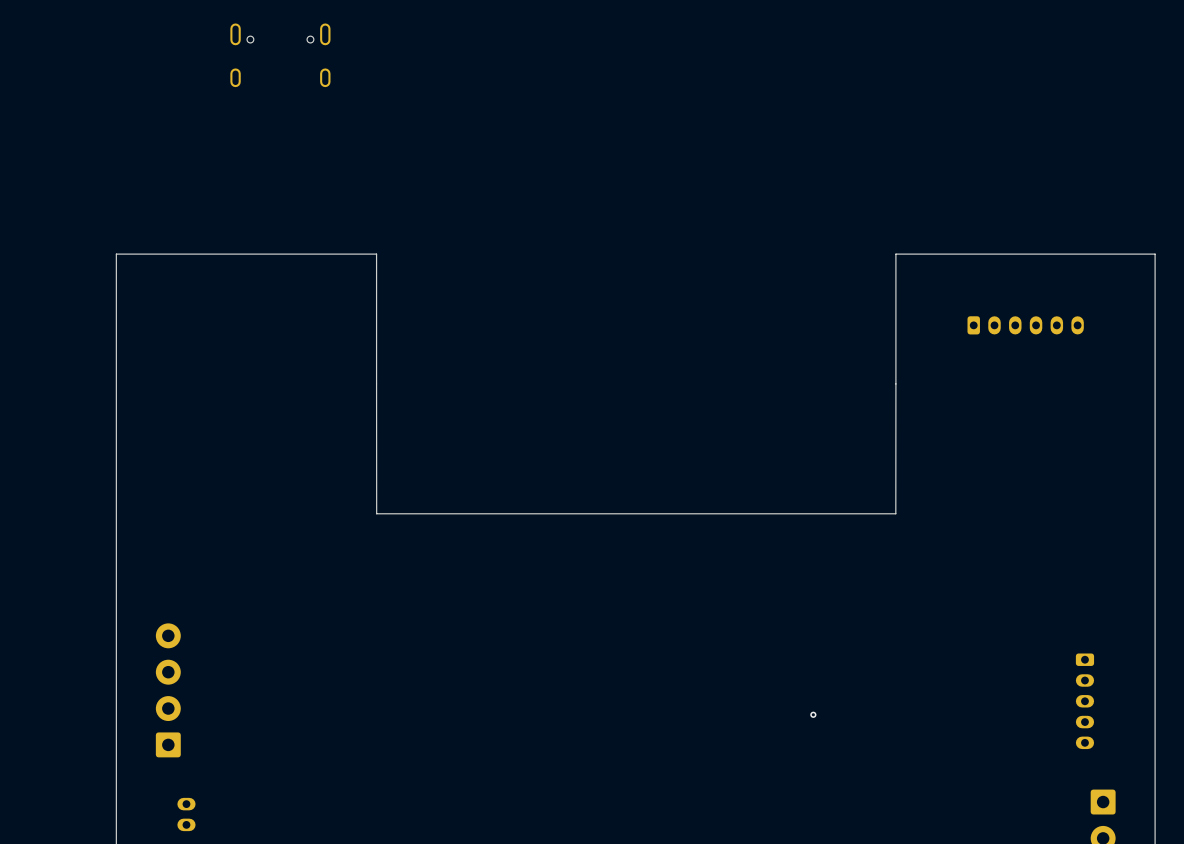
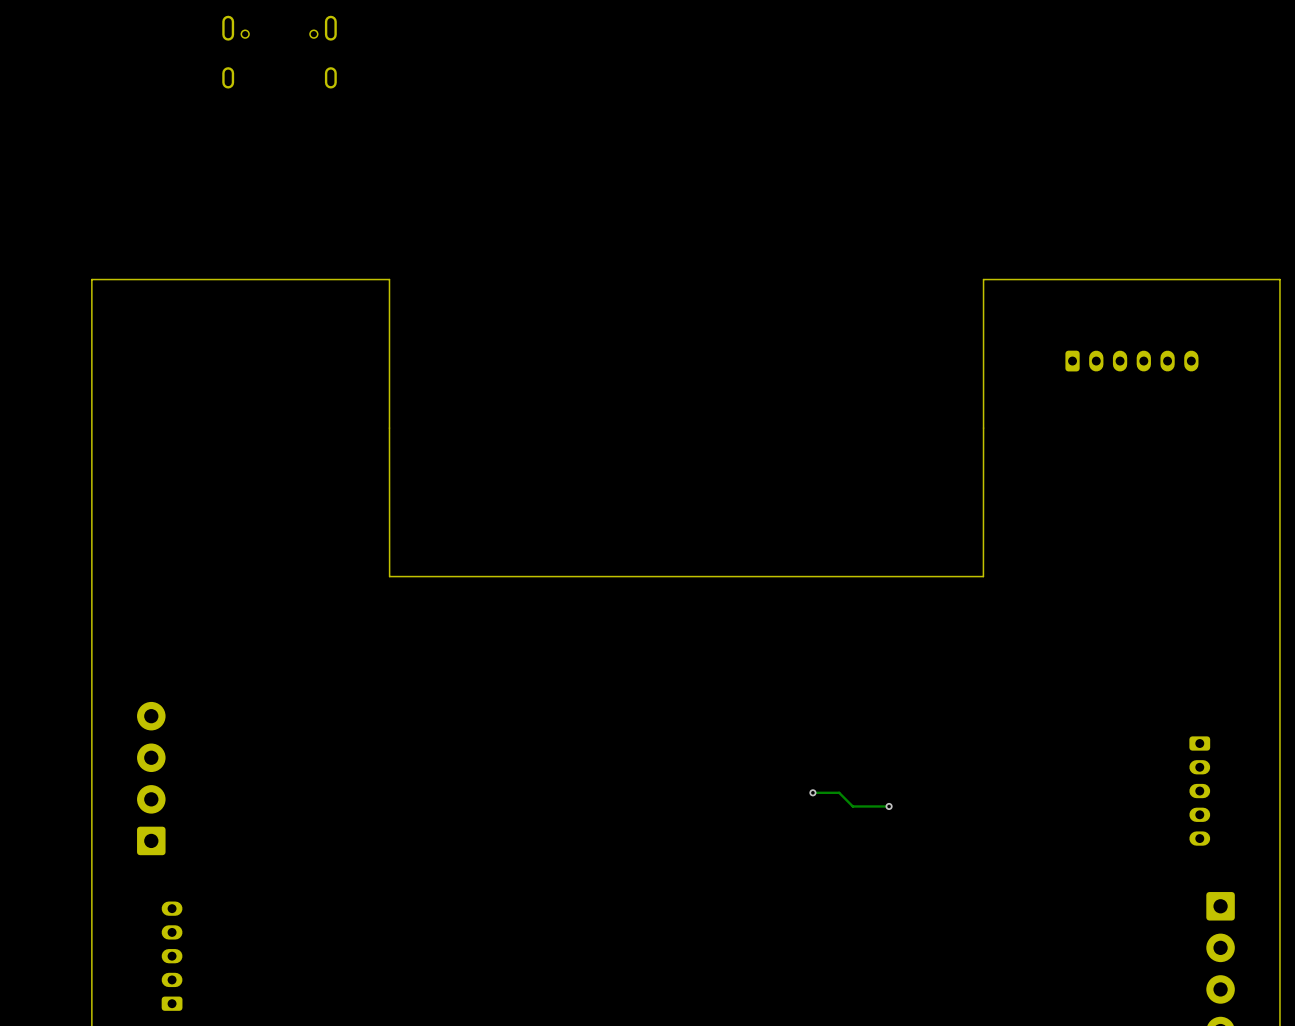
track: none -> (812, 792) (839, 792) (852, 806) (889, 806)
via: none -> (812, 792)

